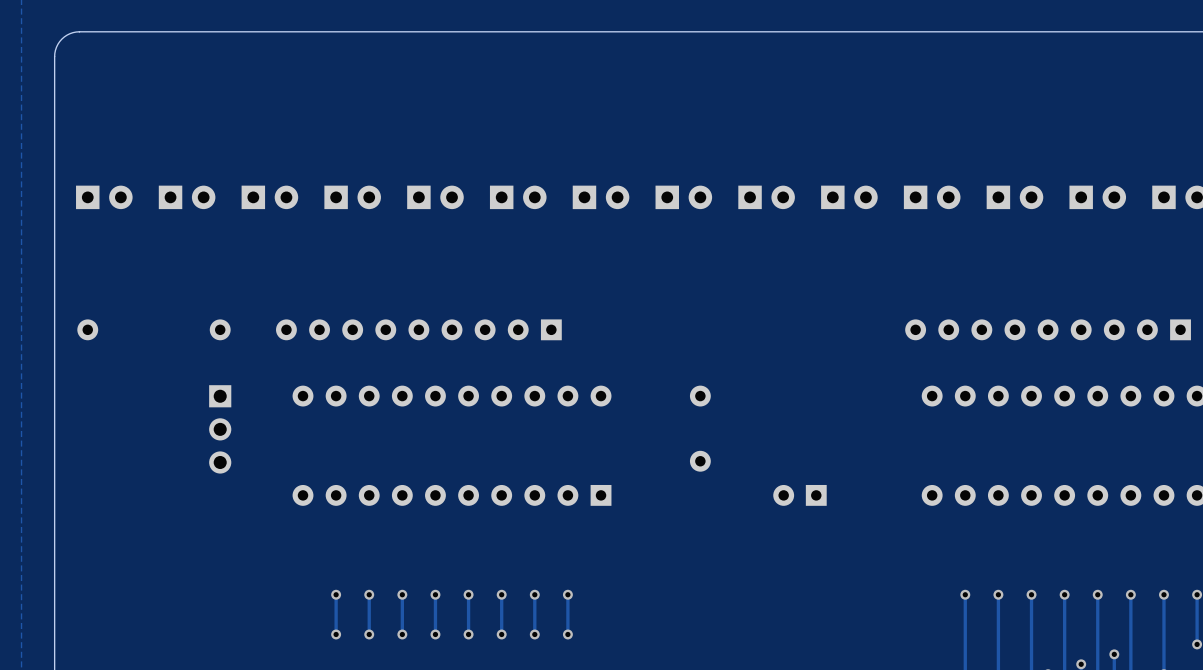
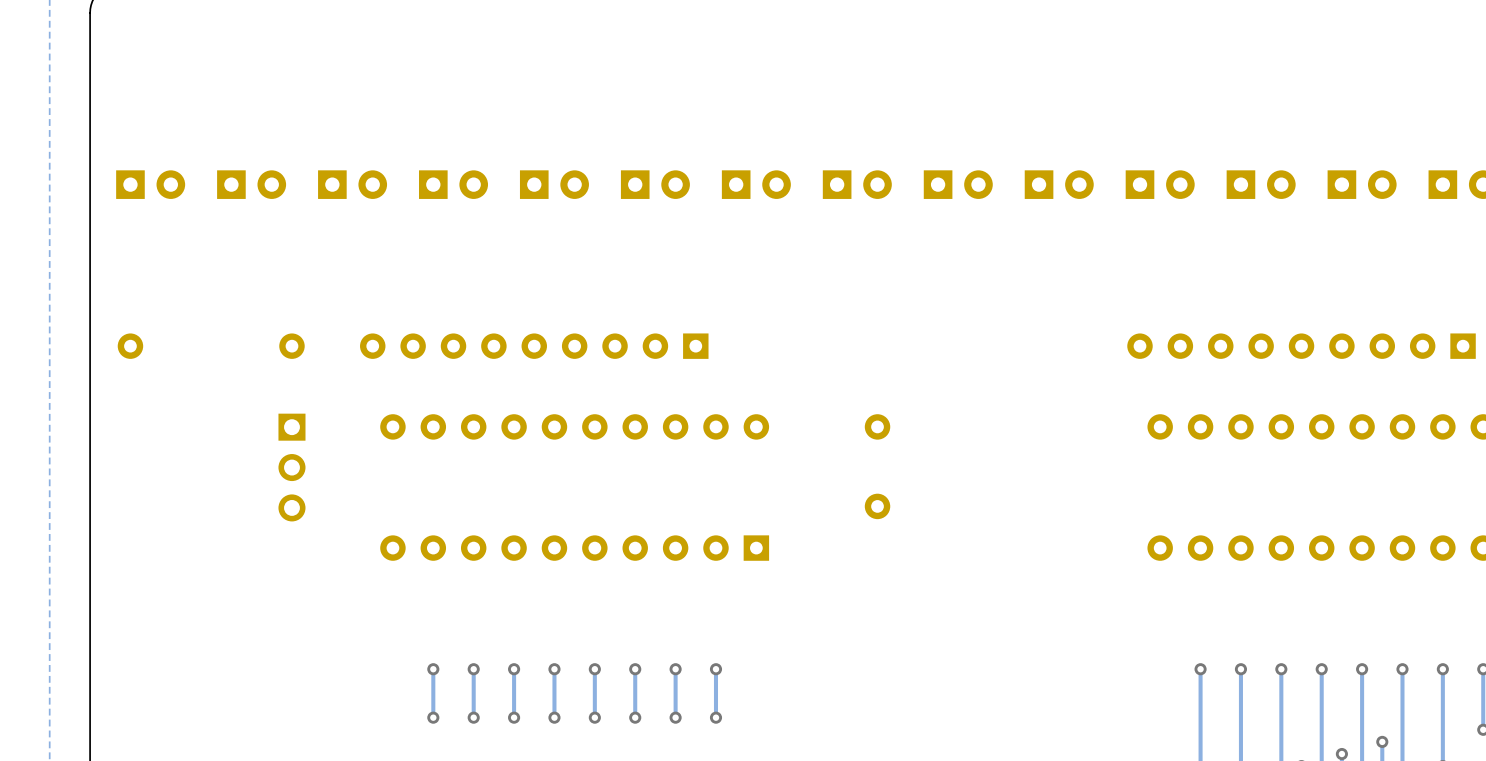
part: (799, 495) -> none

